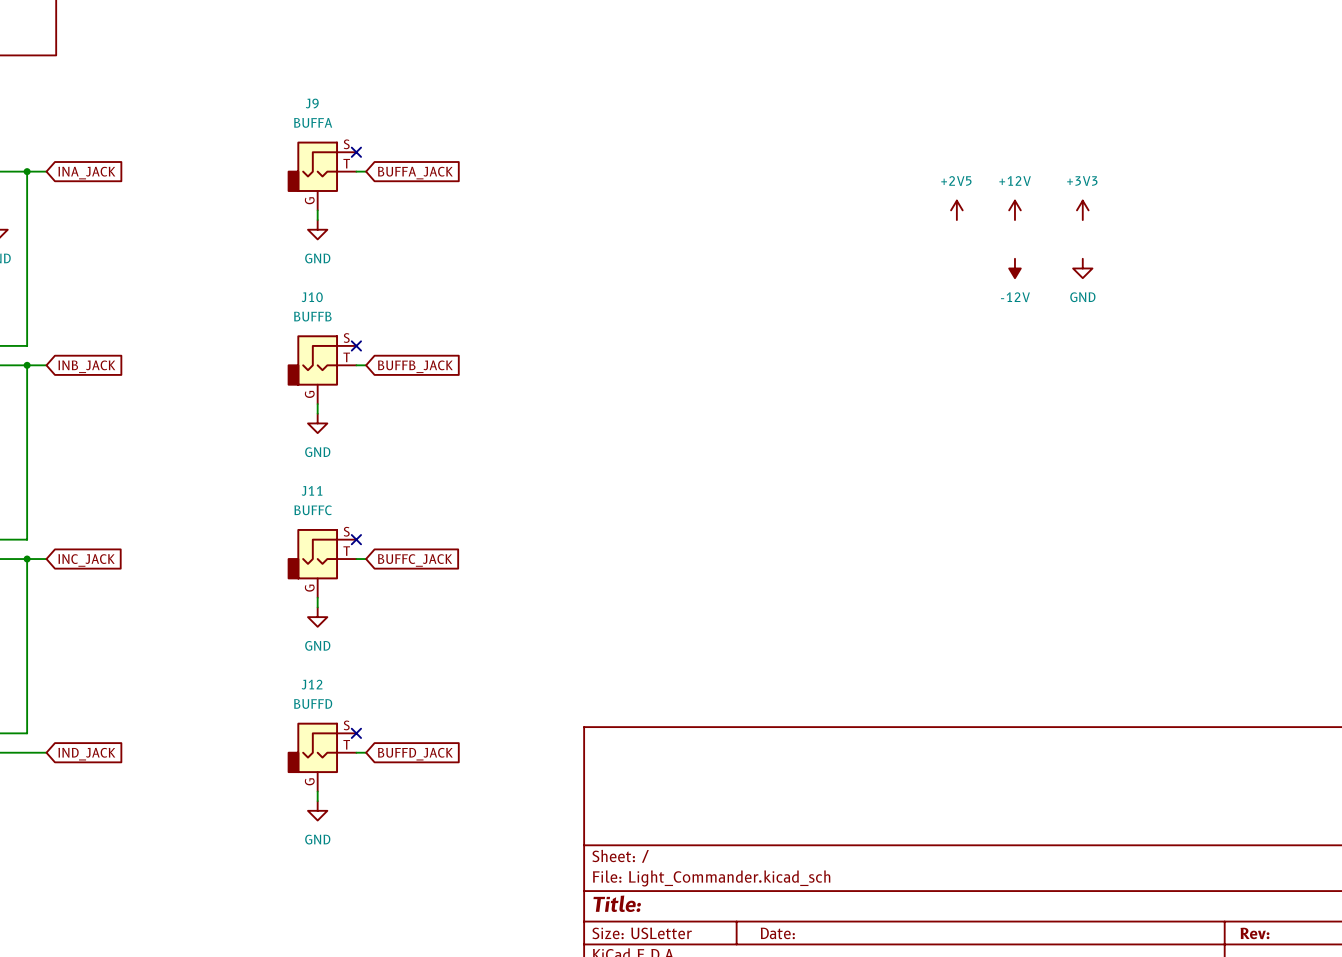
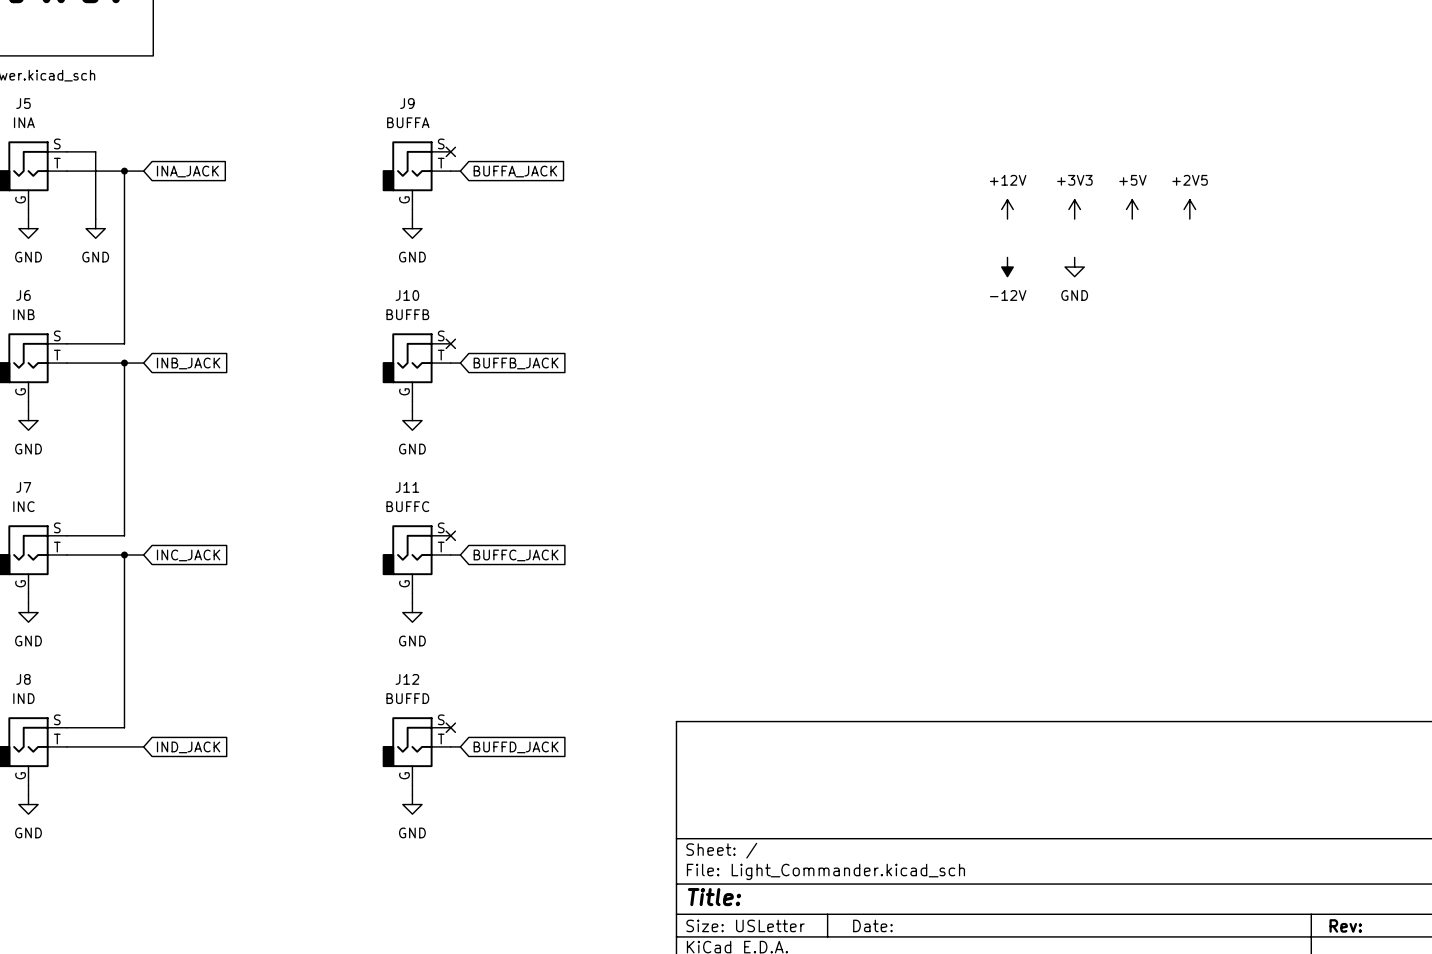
power symbol position: +2V5 (956, 210) -> +2V5 (1189, 209)
power symbol position: +12V (1014, 210) -> +12V (1007, 209)
power symbol: none -> +5V (1132, 209)
power symbol position: +3V3 (1082, 210) -> +3V3 (1074, 209)
power symbol position: -12V (1014, 268) -> -12V (1007, 267)
power symbol position: GND (1082, 268) -> GND (1074, 267)

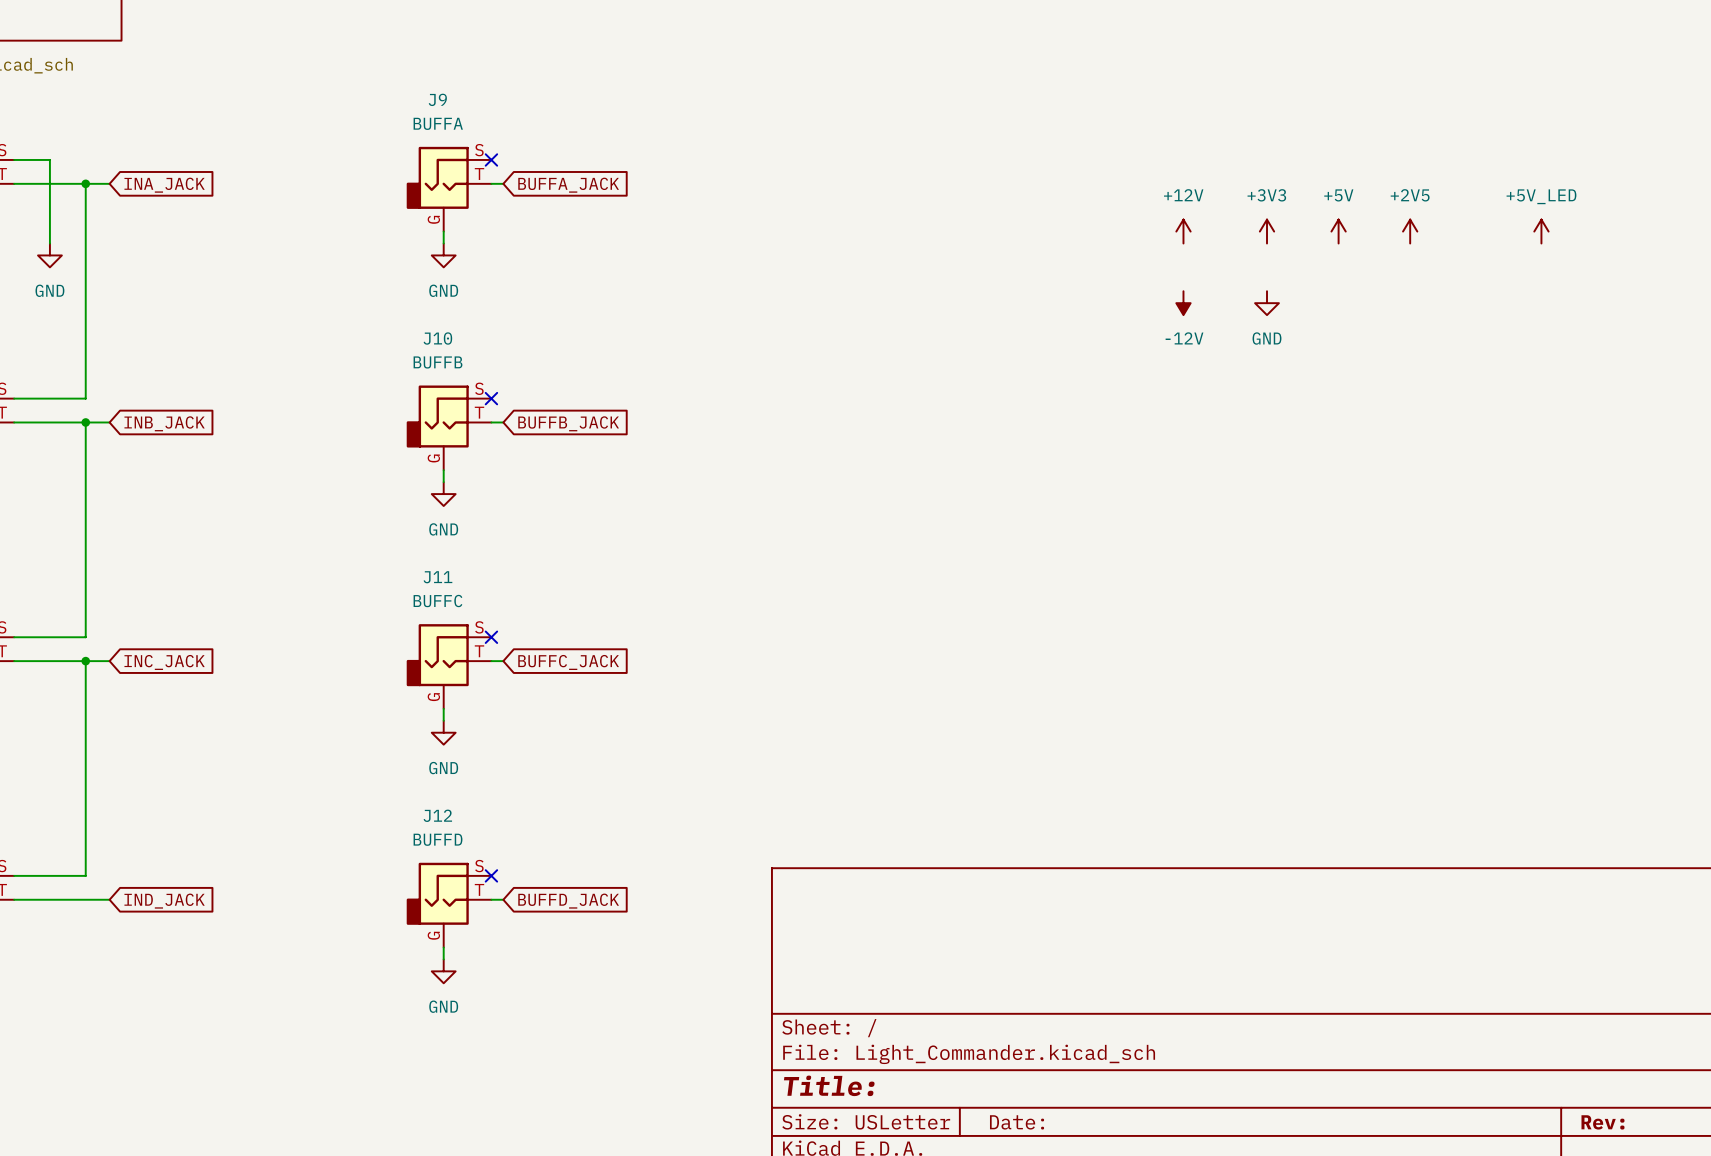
power symbol: none -> +5V_LED (1541, 231)

